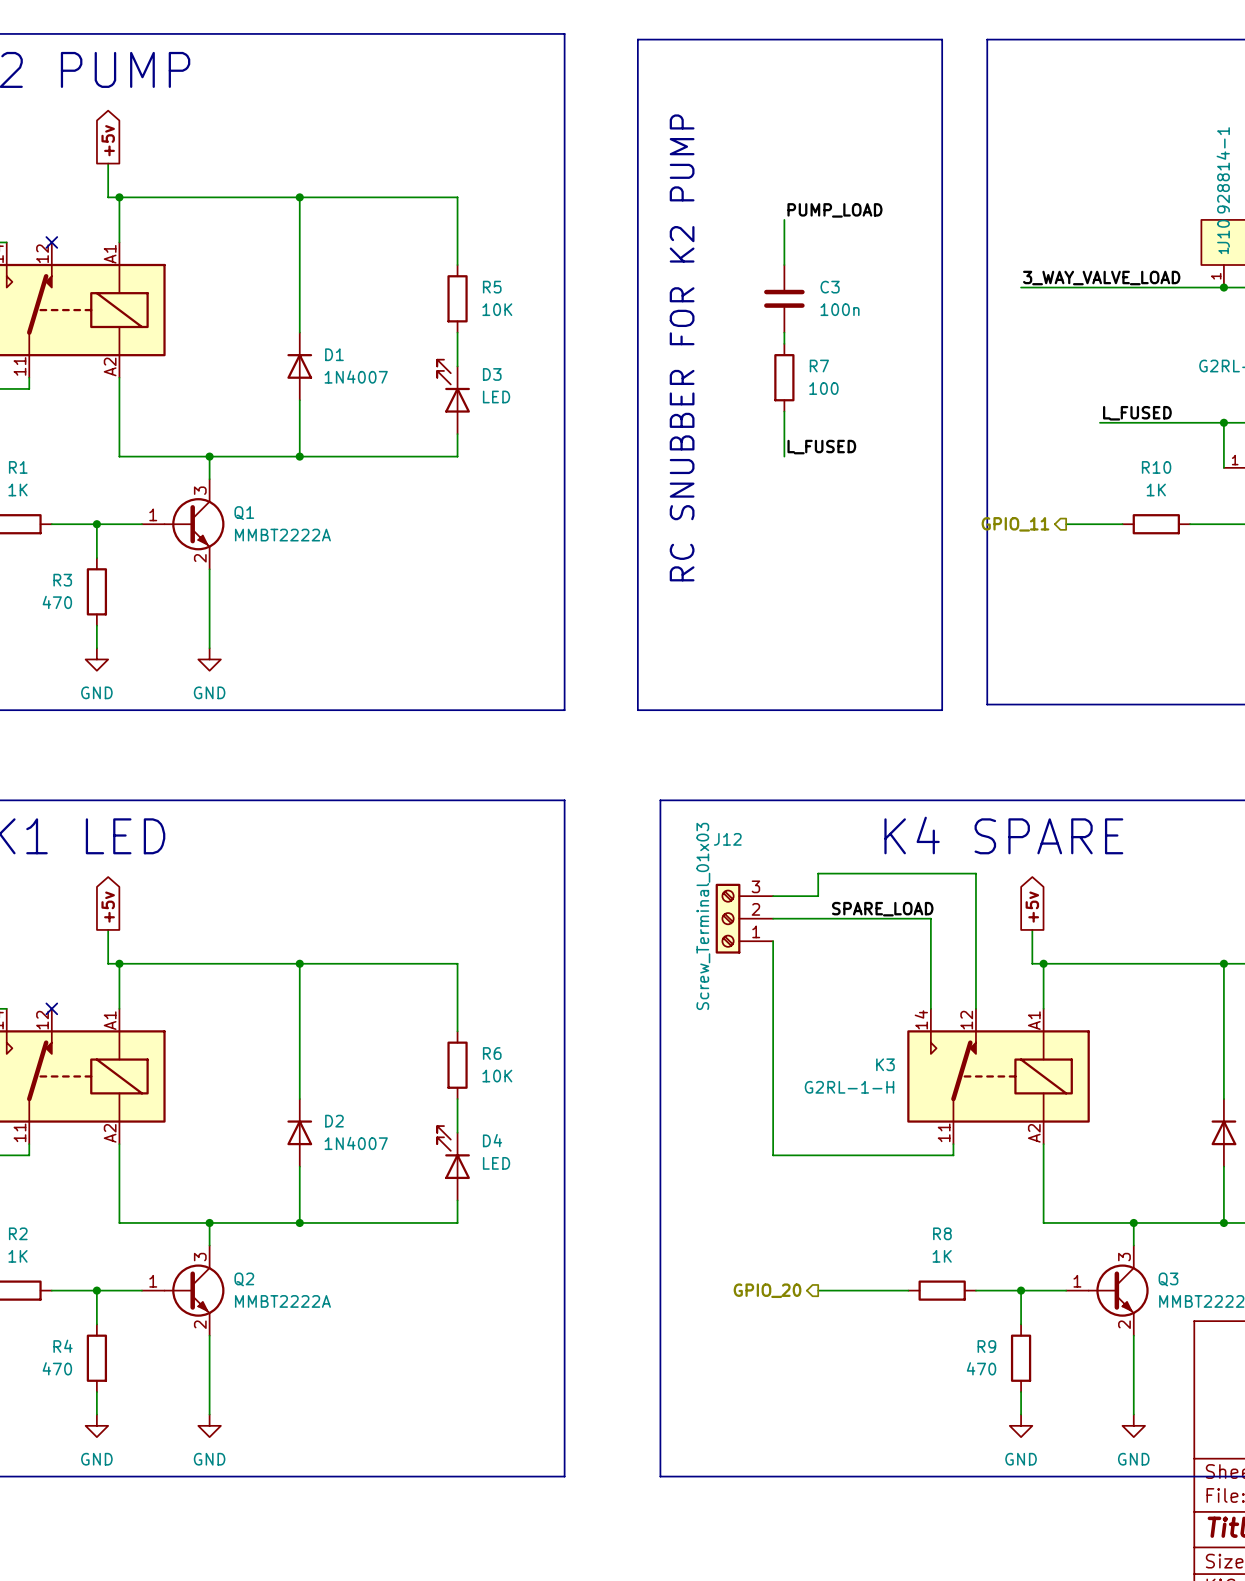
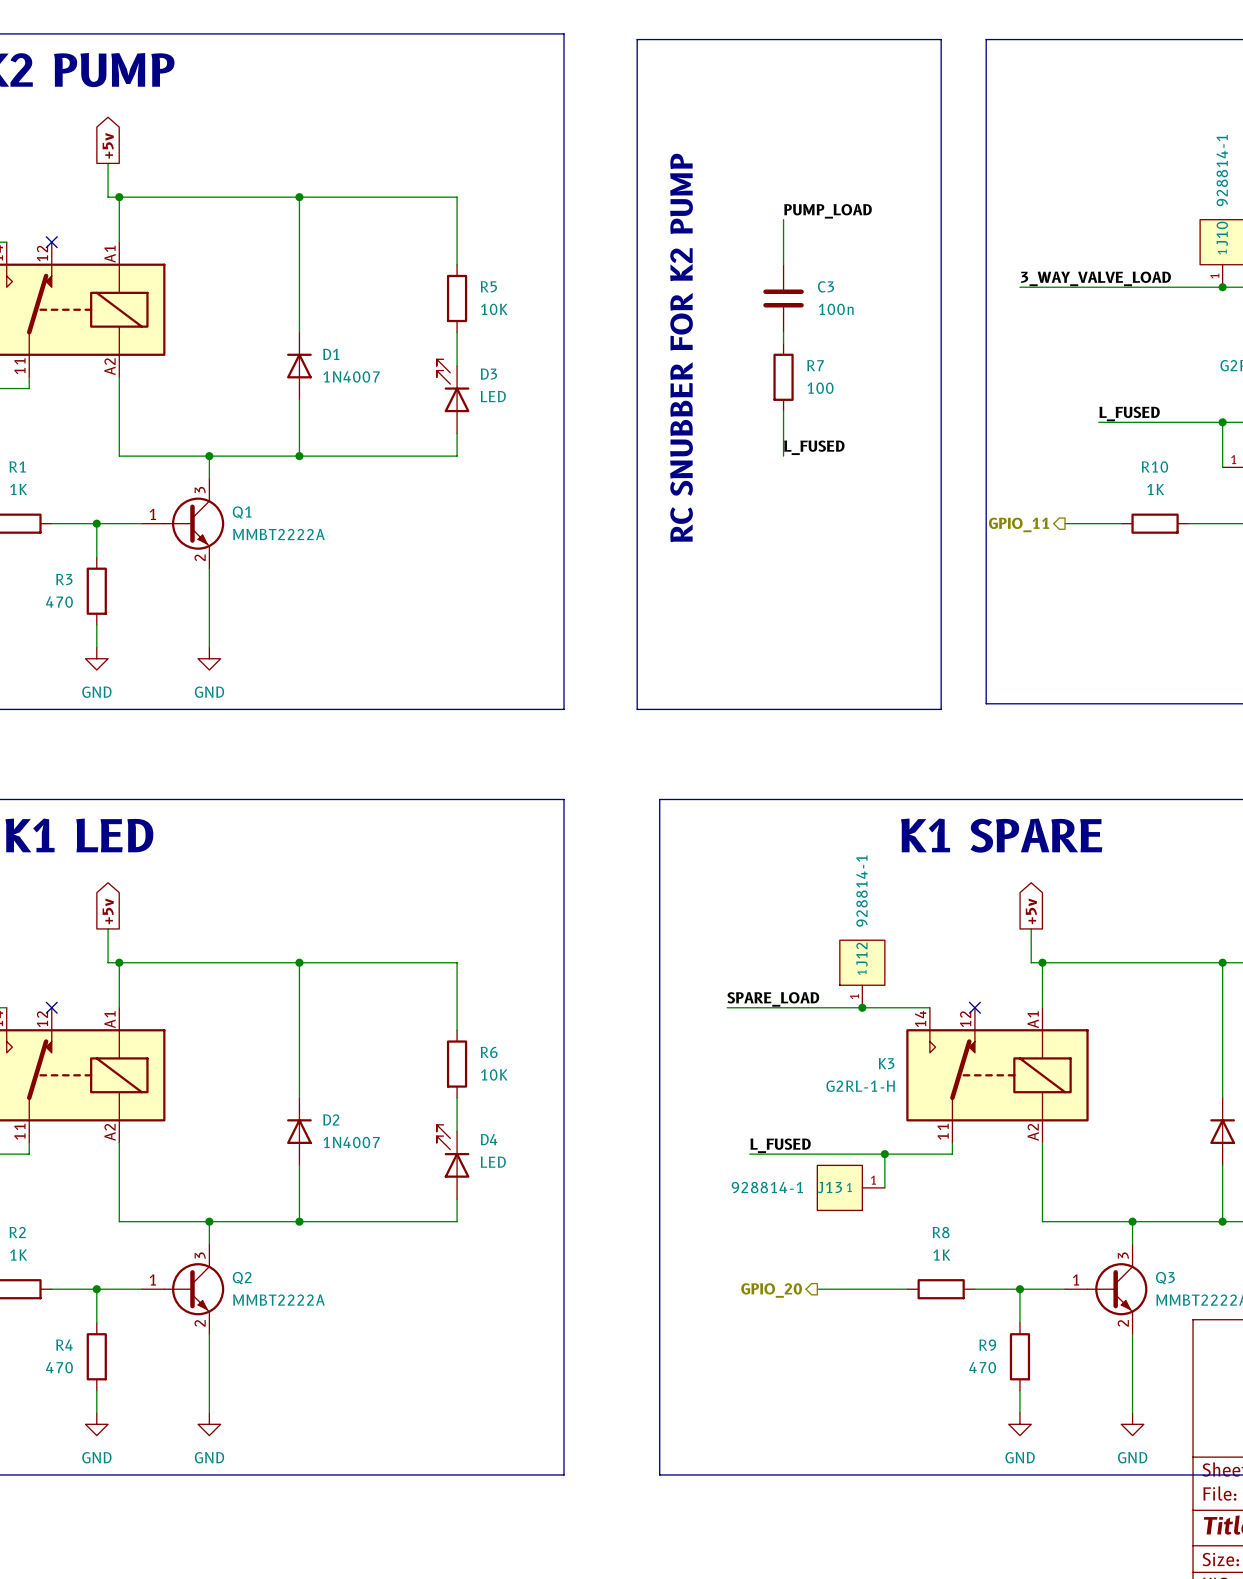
text: K4 SPARE (1003, 835) -> K1 SPARE (1001, 835)
J12 name position: J12 (727, 839) -> J12 (862, 954)
J12 symbol: [715, 883, 774, 954] -> [839, 939, 886, 1008]
wire: (773, 896) (818, 896) (818, 873) (975, 873) (975, 1008) -> none
label position: SPARE_LOAD (882, 909) -> SPARE_LOAD (773, 999)
J12 value: Screw_Terminal_01x03 (703, 916) -> 928814-1 (862, 891)
wire: (773, 918) (930, 918) (930, 1008) -> (727, 1007) (929, 1007)
wire: (773, 941) (773, 1155) -> (749, 1154) (772, 1154)
junction: none -> (862, 1007)
no-connect mark: none -> (974, 1007)
label: none -> L_FUSED (780, 1145)
wire: none -> (884, 1154) (884, 1187)
junction: none -> (884, 1154)
J13: none -> 928814-1 (850, 1187)

